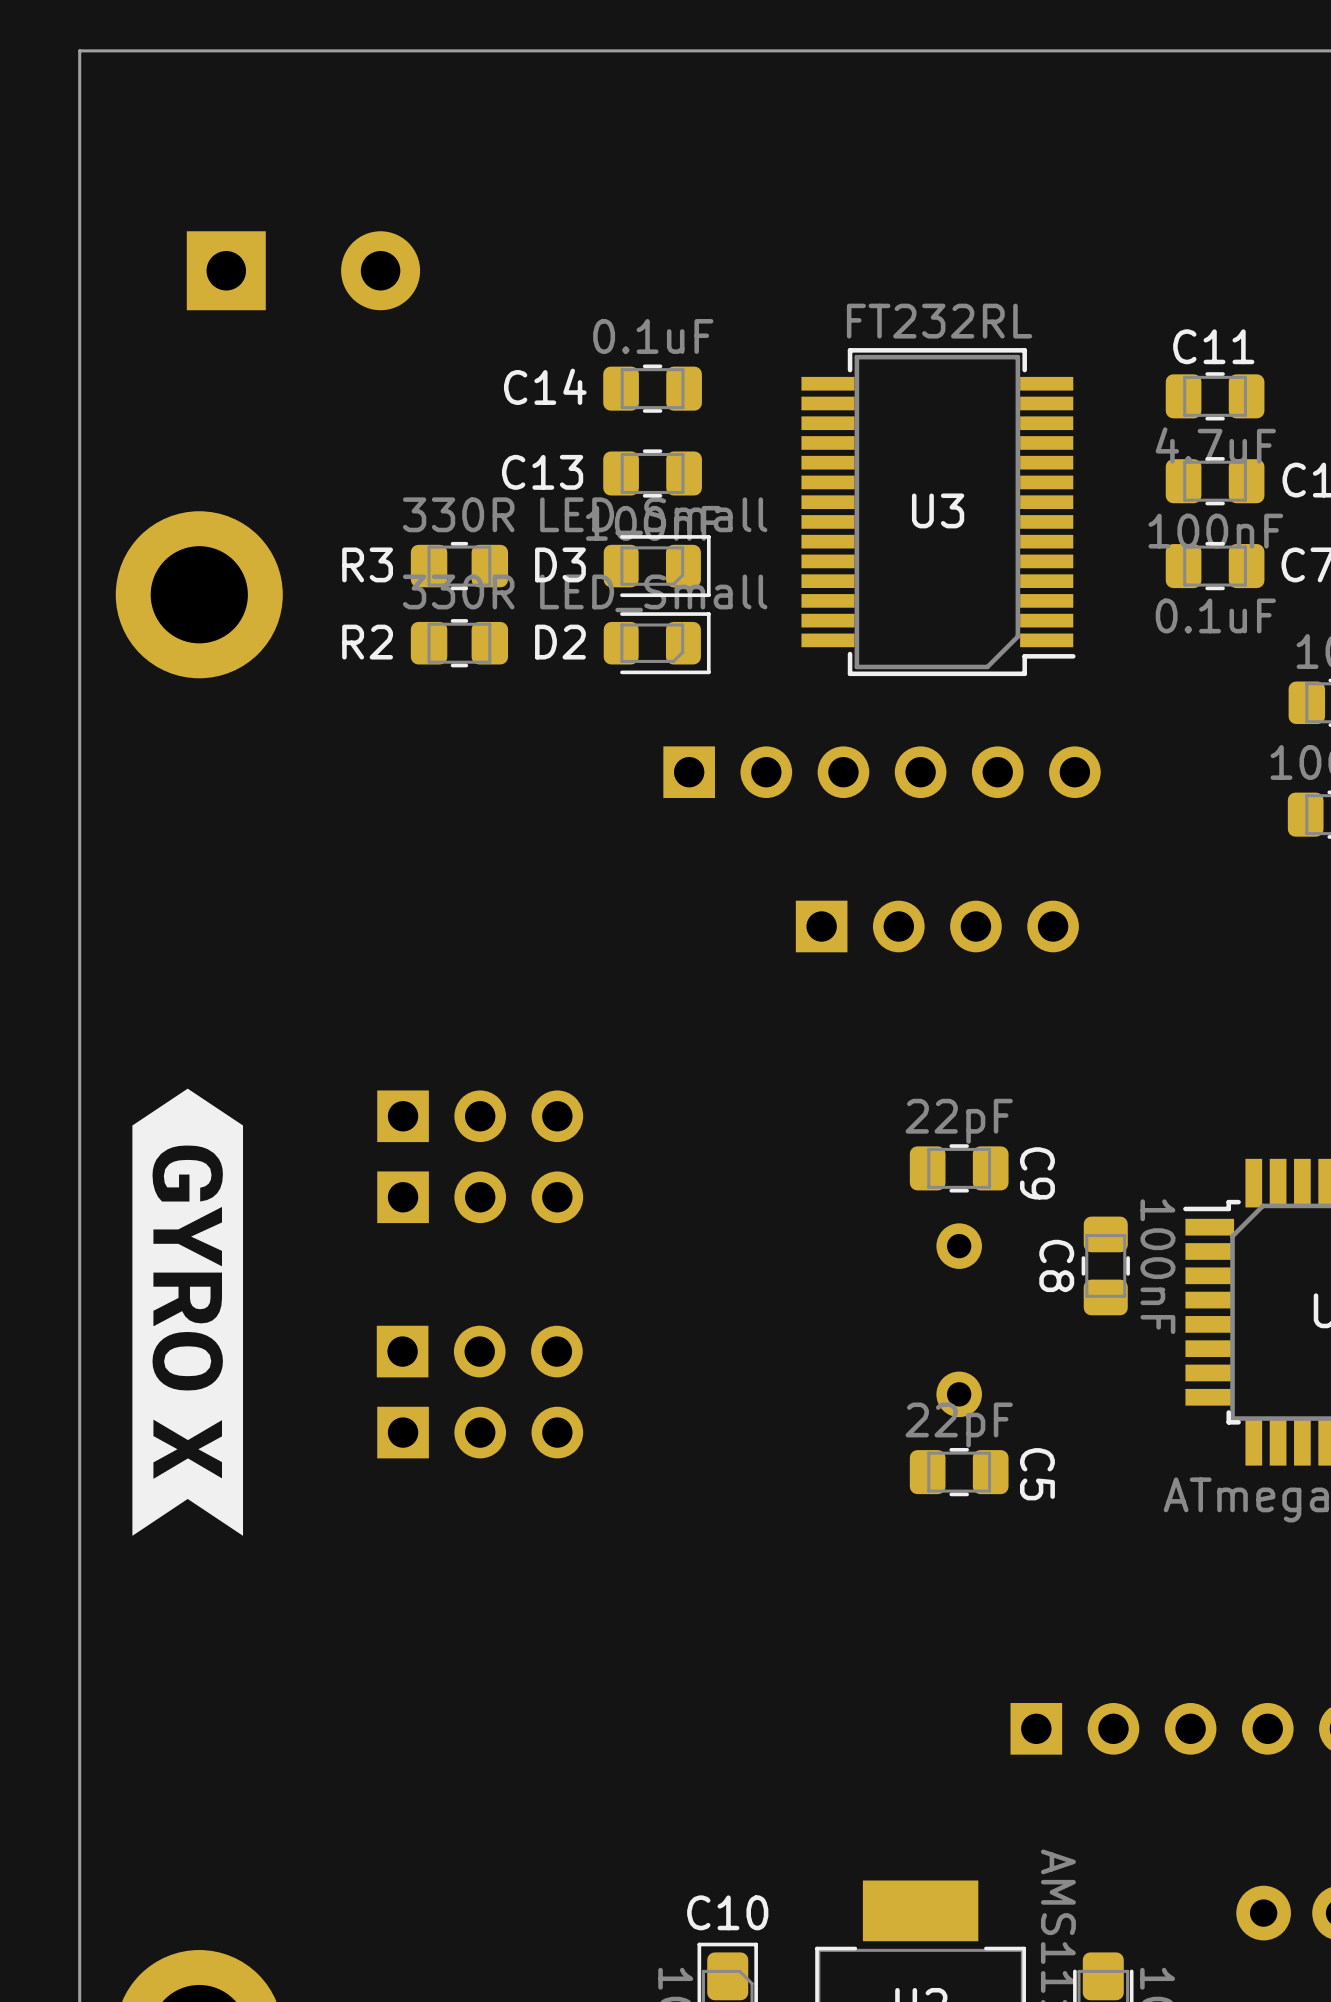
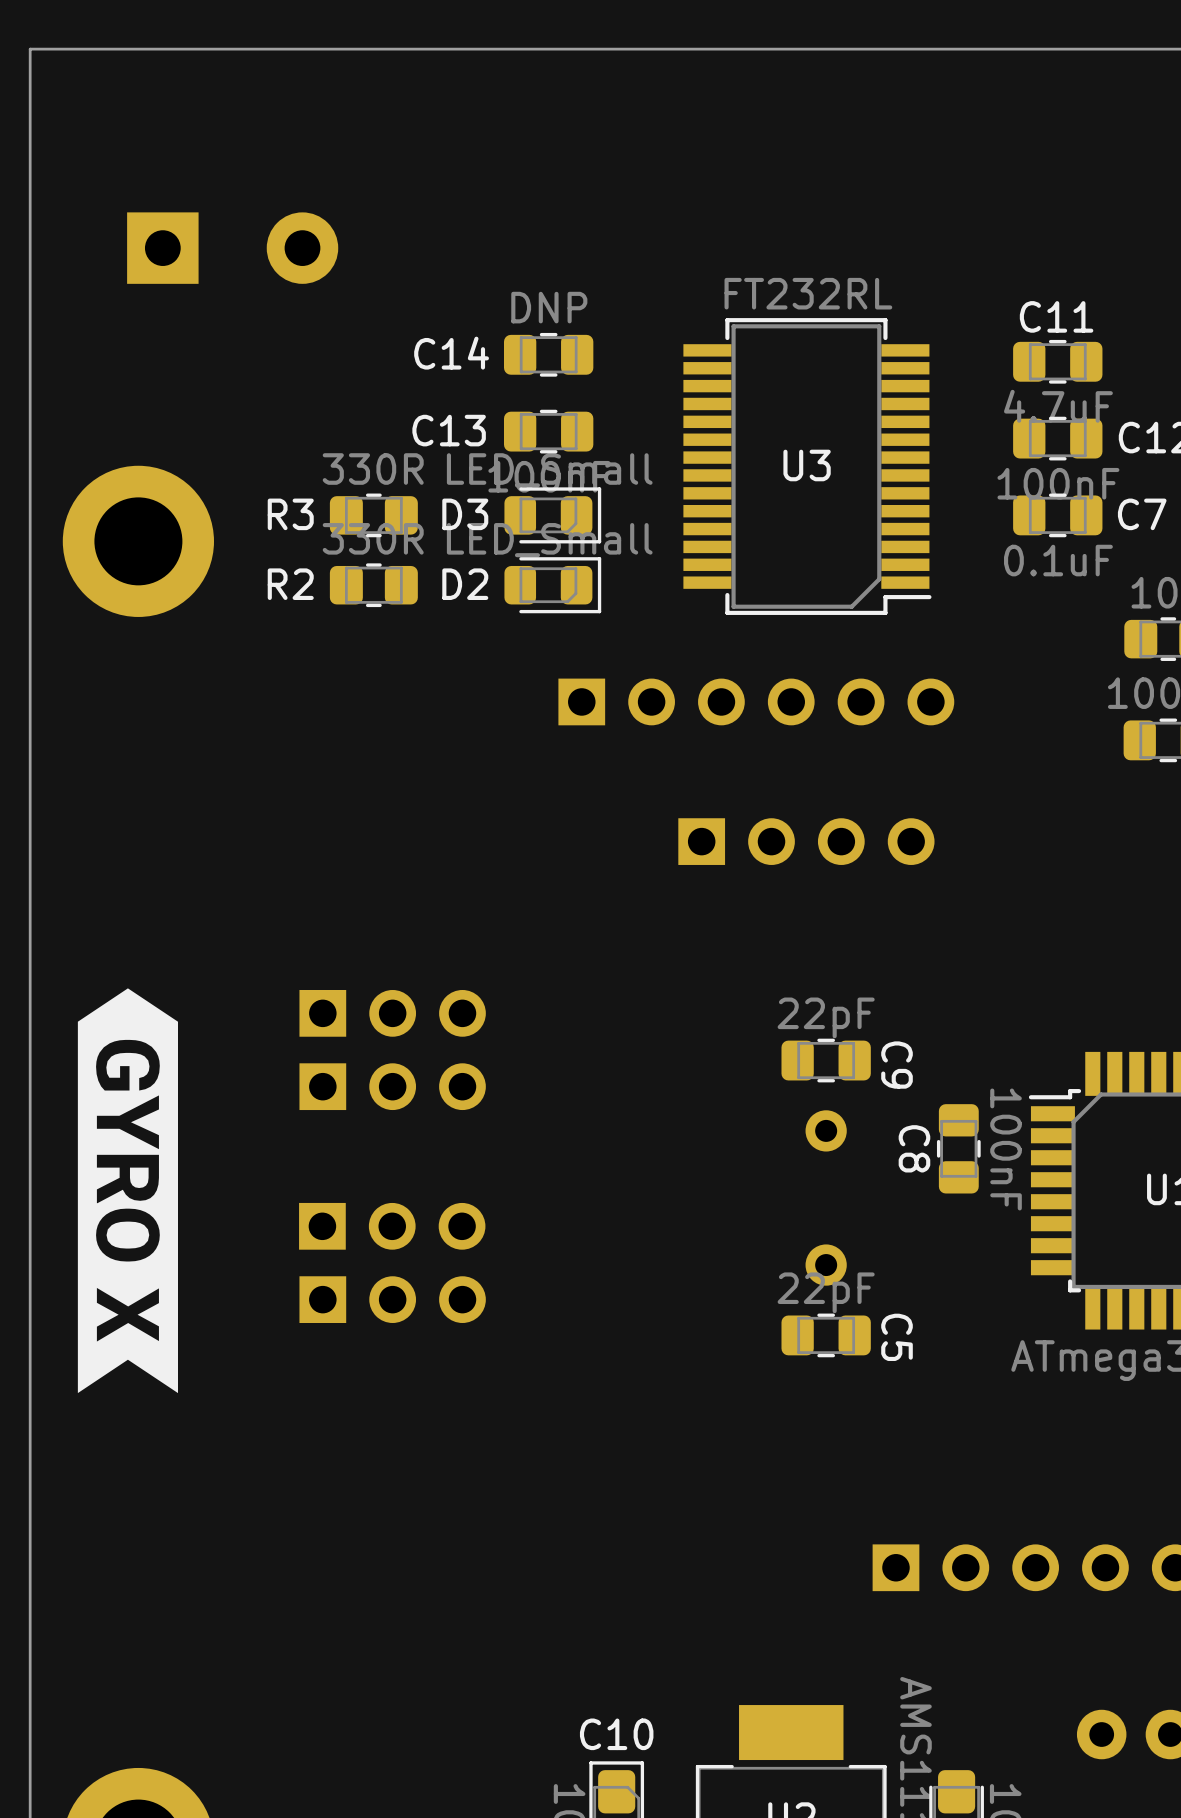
C14 value: 0.1uF (653, 336) -> DNP (549, 307)

